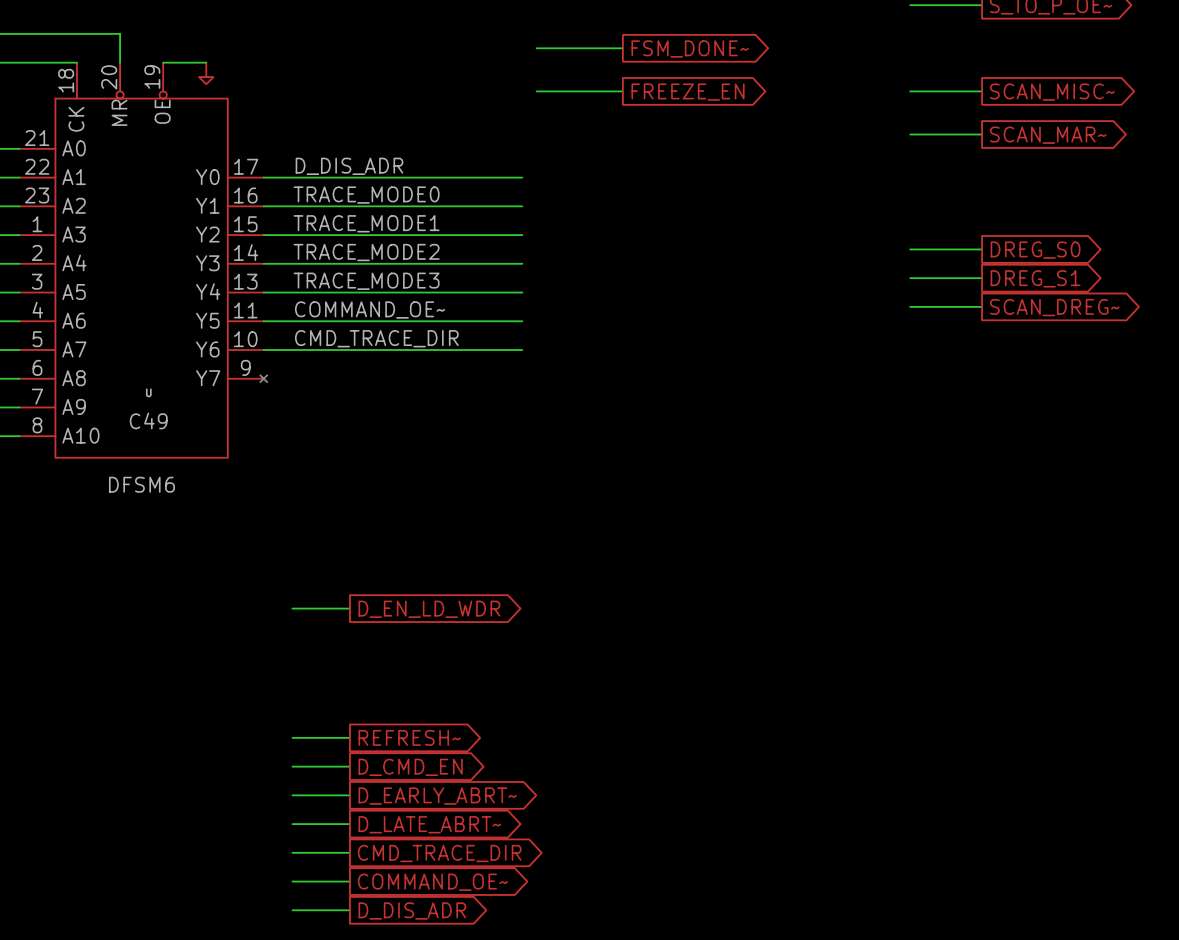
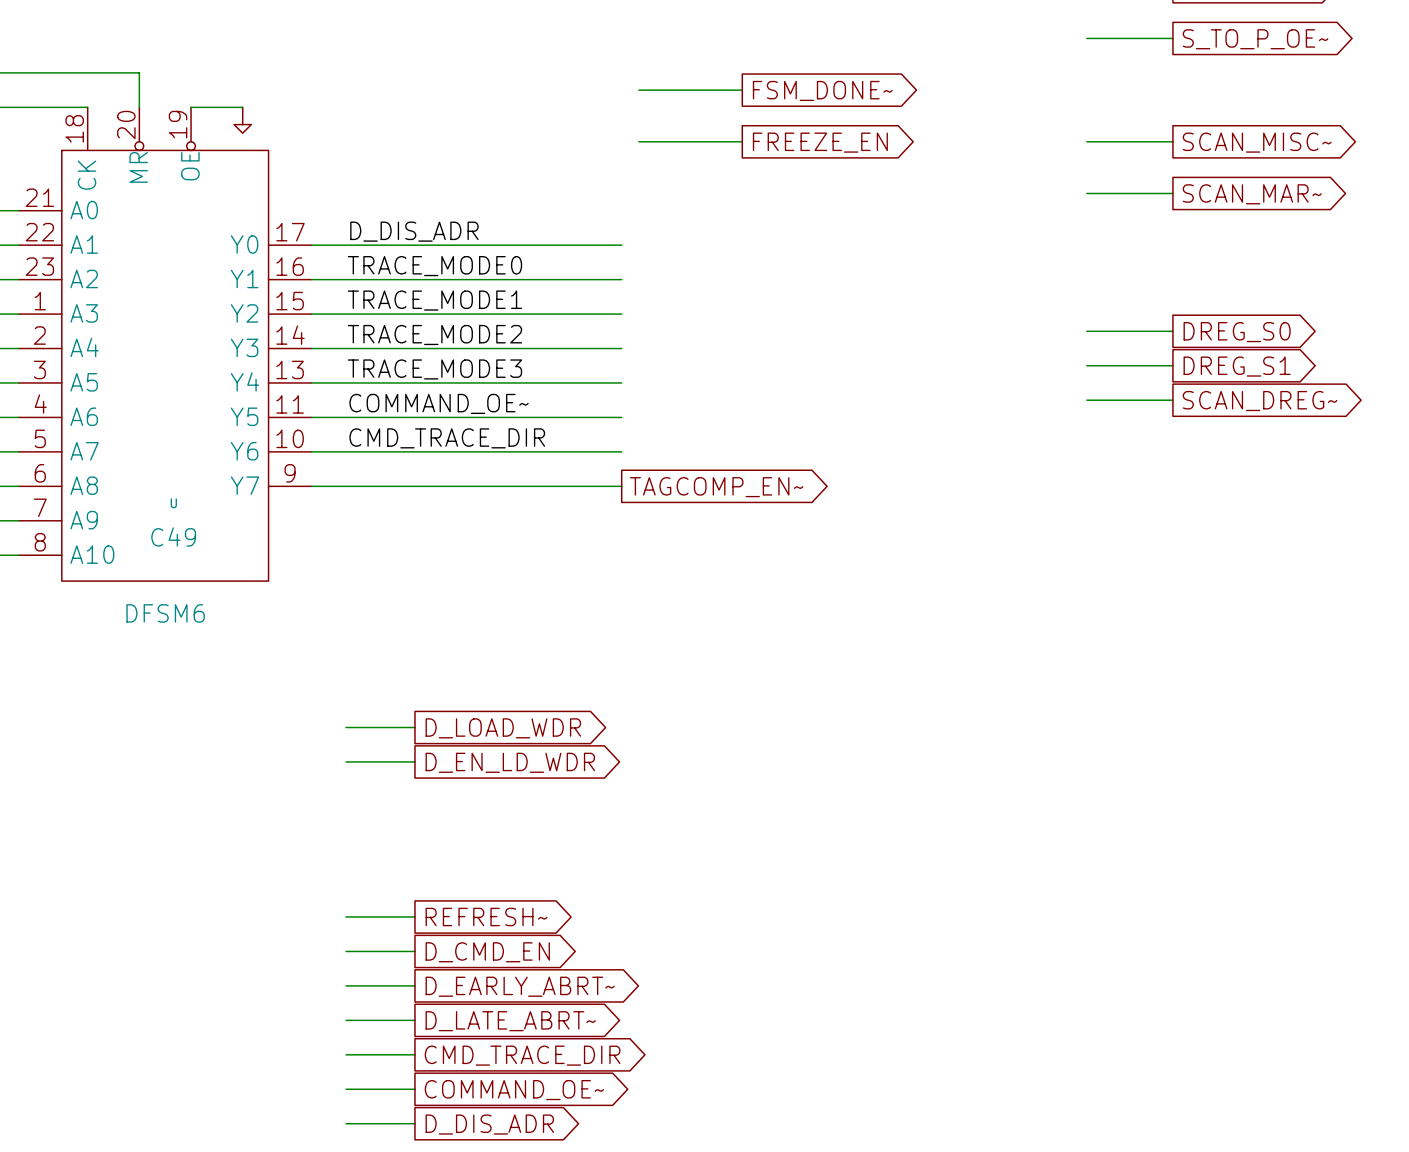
wire: none -> (311, 486) (621, 486)
no-connect mark: (263, 378) -> none
global label: none -> TAGCOMP_EN~ (716, 487)
wire: none -> (346, 727) (414, 727)
global label: none -> D_LOAD_WDR (503, 728)

